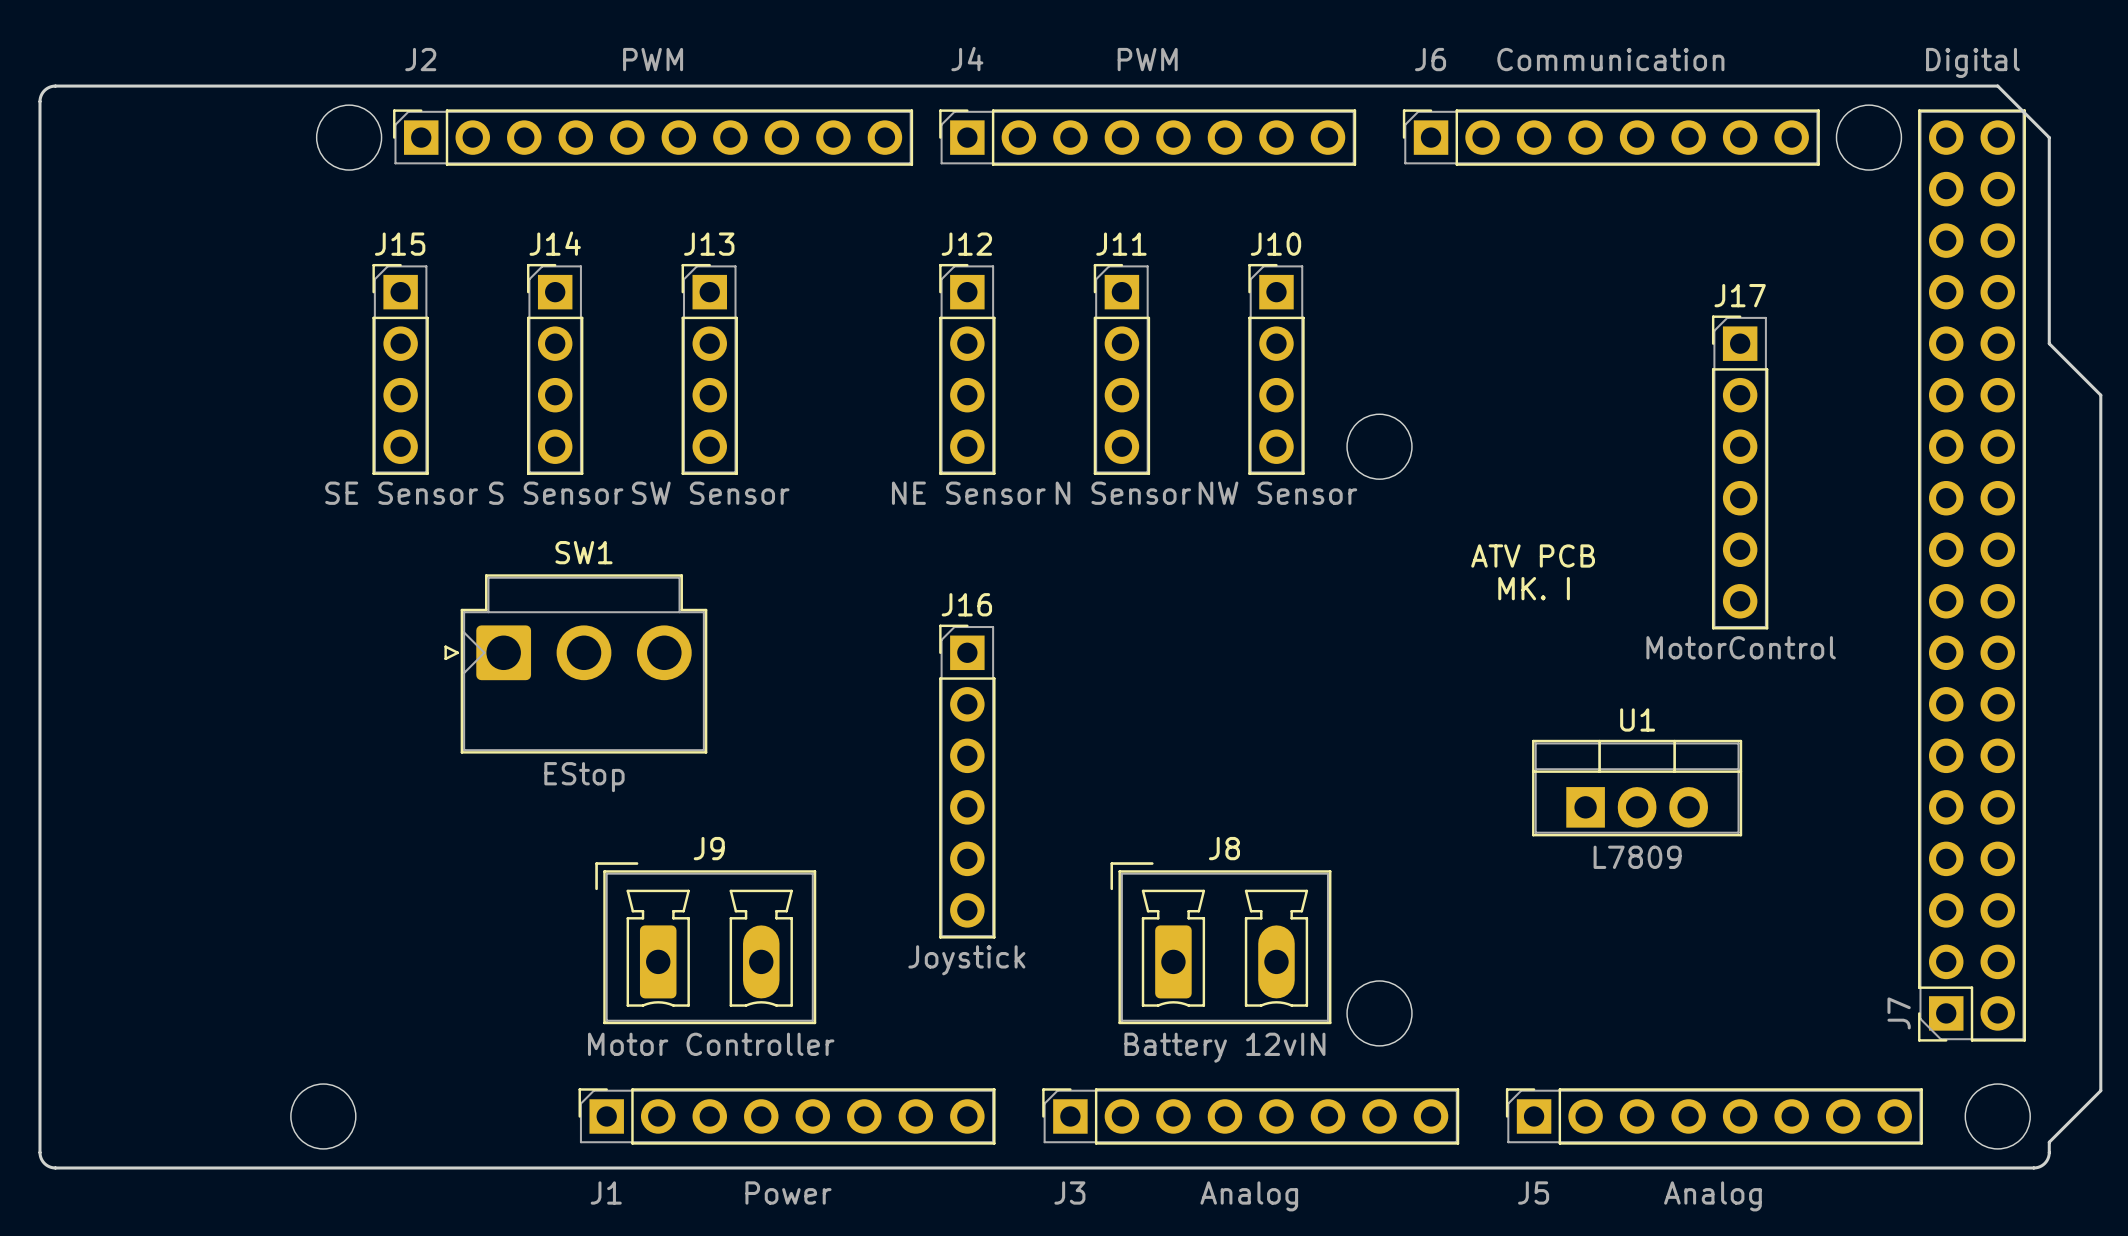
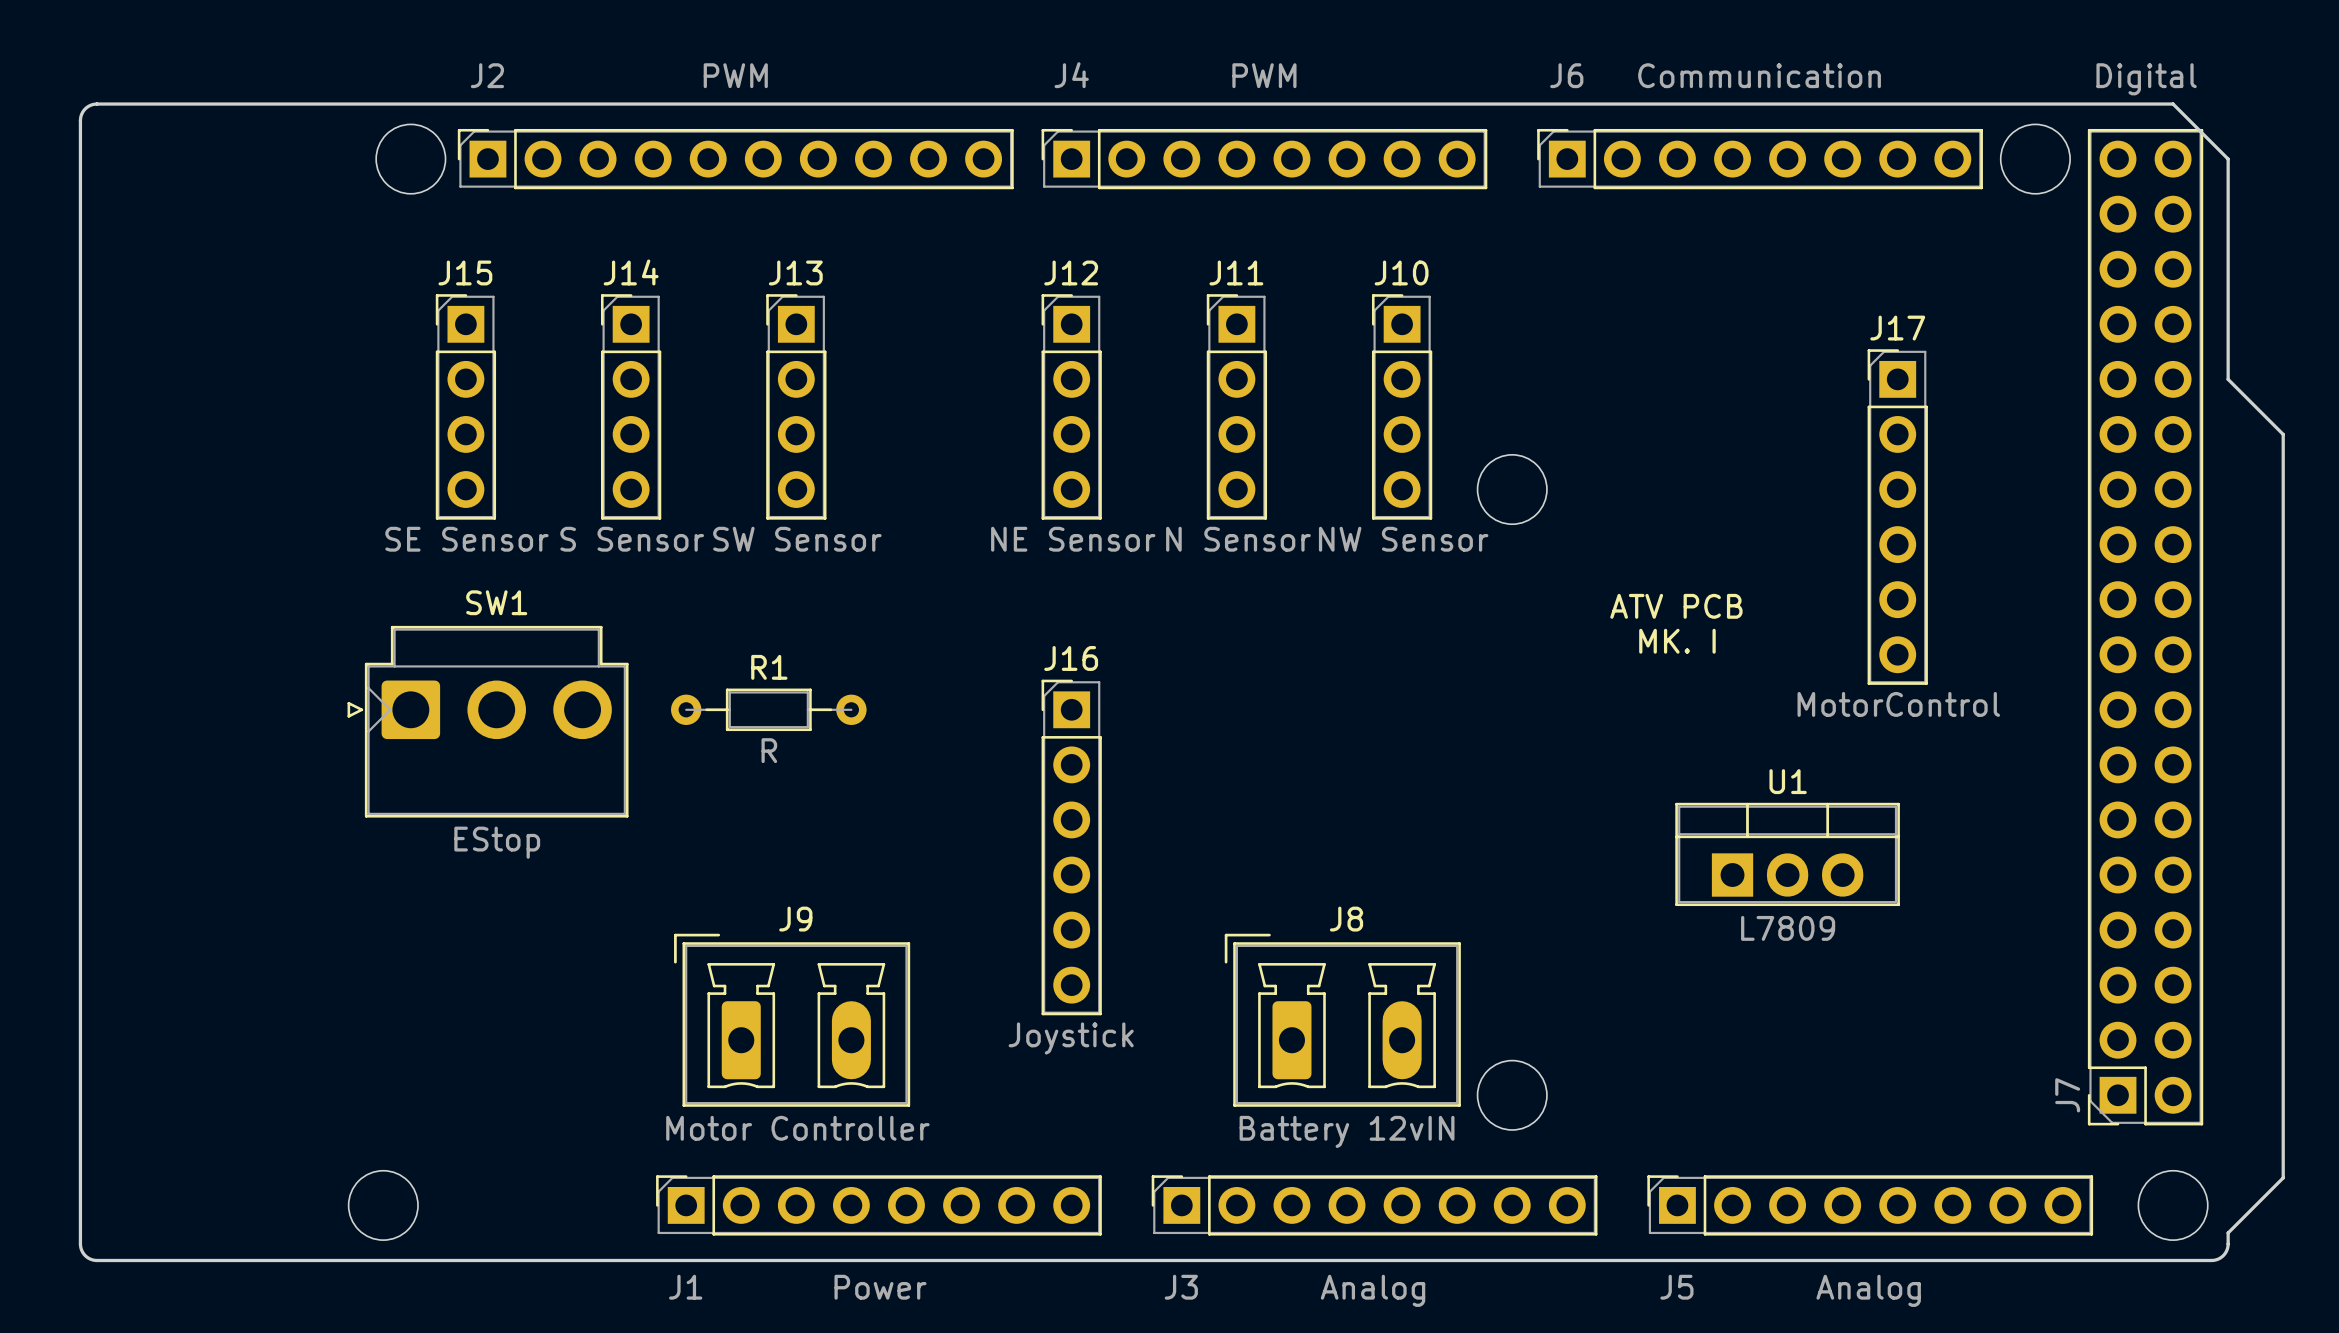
R1: none -> R (768, 709)
SW1 position: (575, 663) -> (488, 721)

